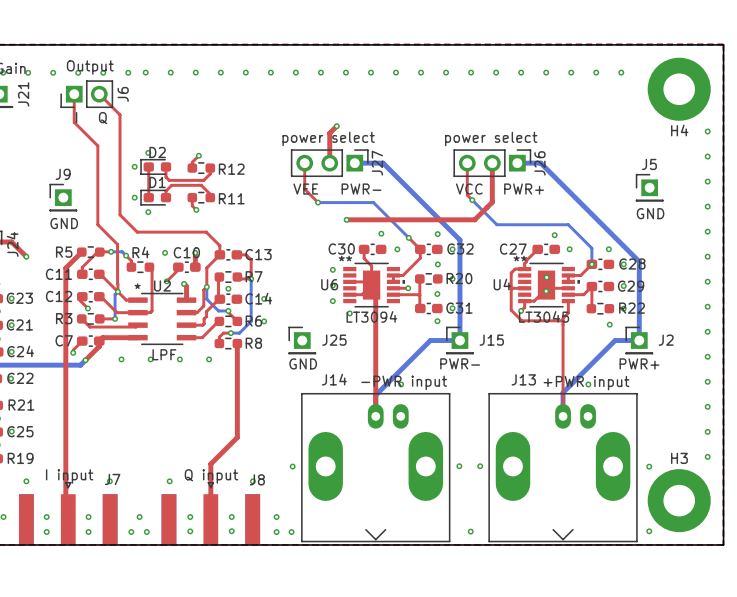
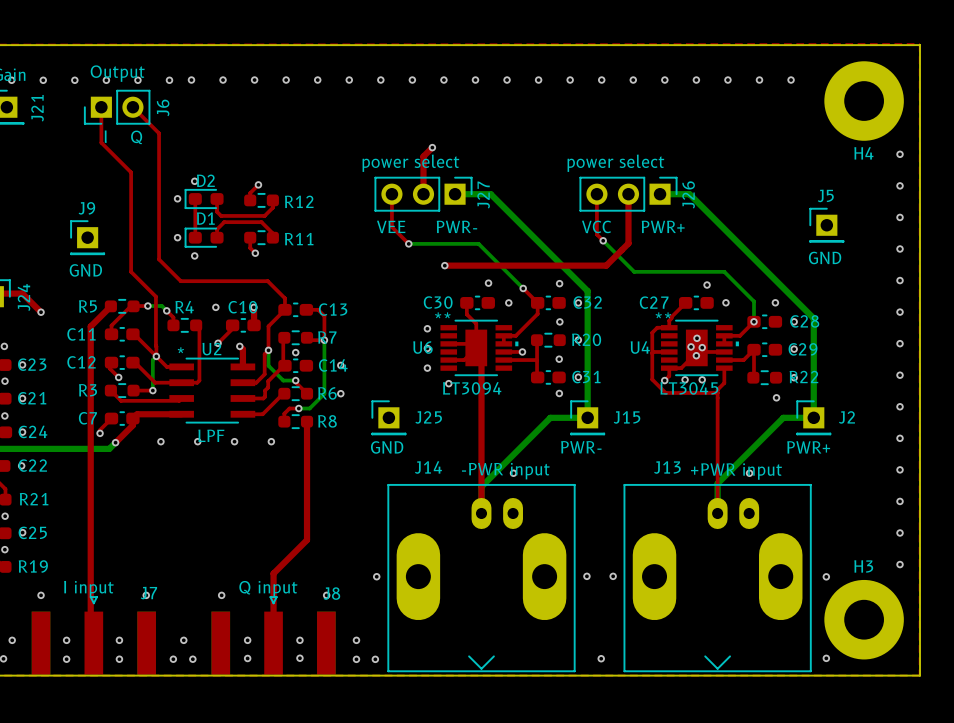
via: none -> (691, 346)
via: none -> (702, 347)
via: none -> (685, 379)
via: none -> (702, 379)

